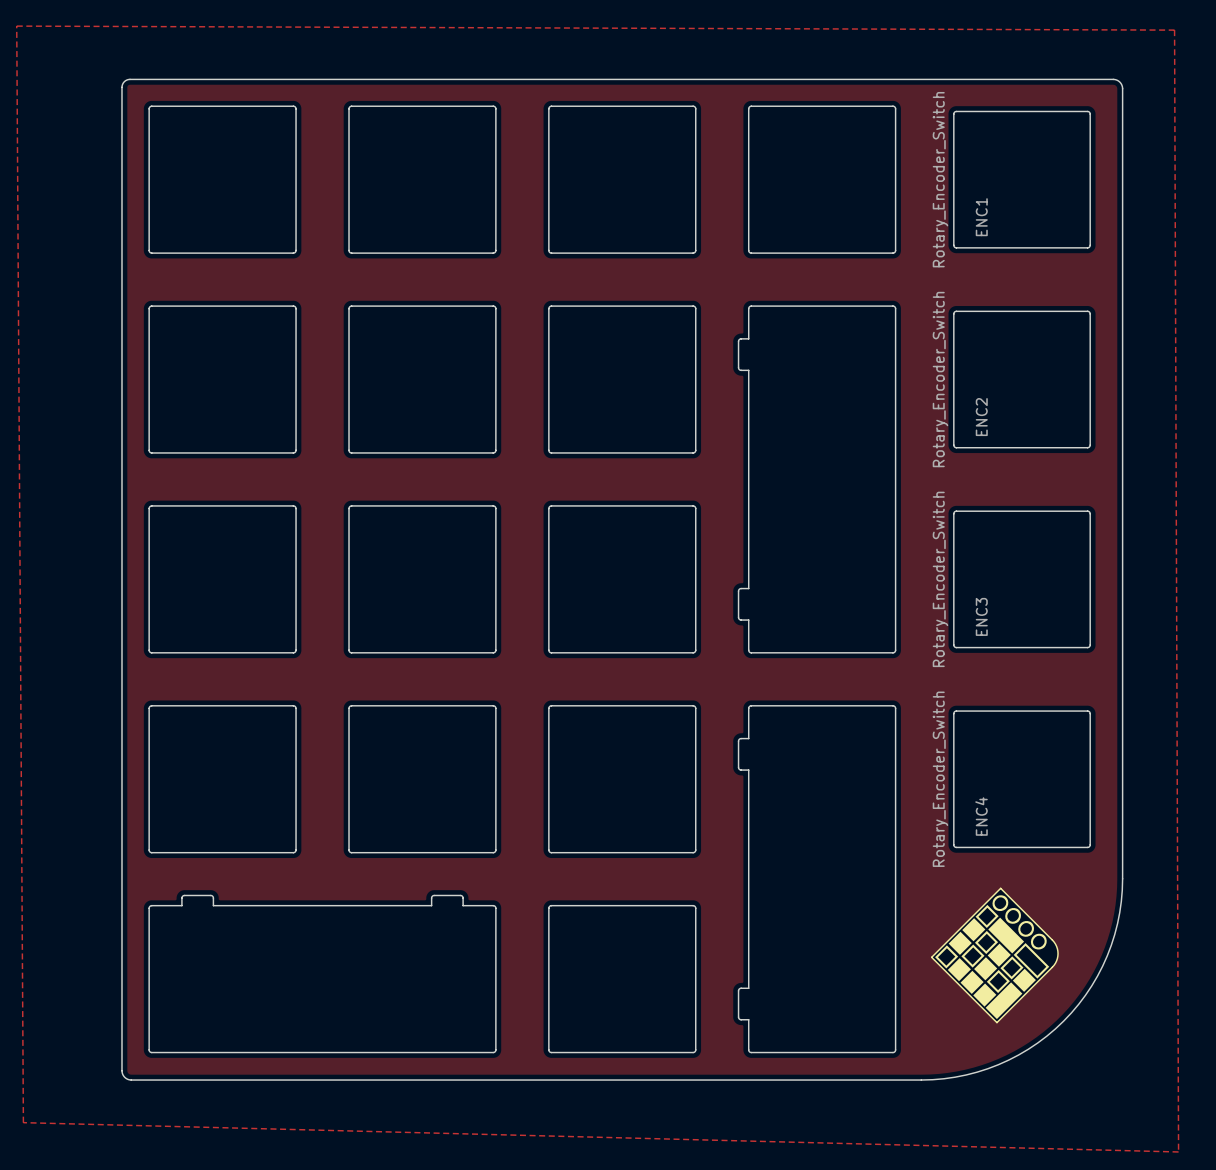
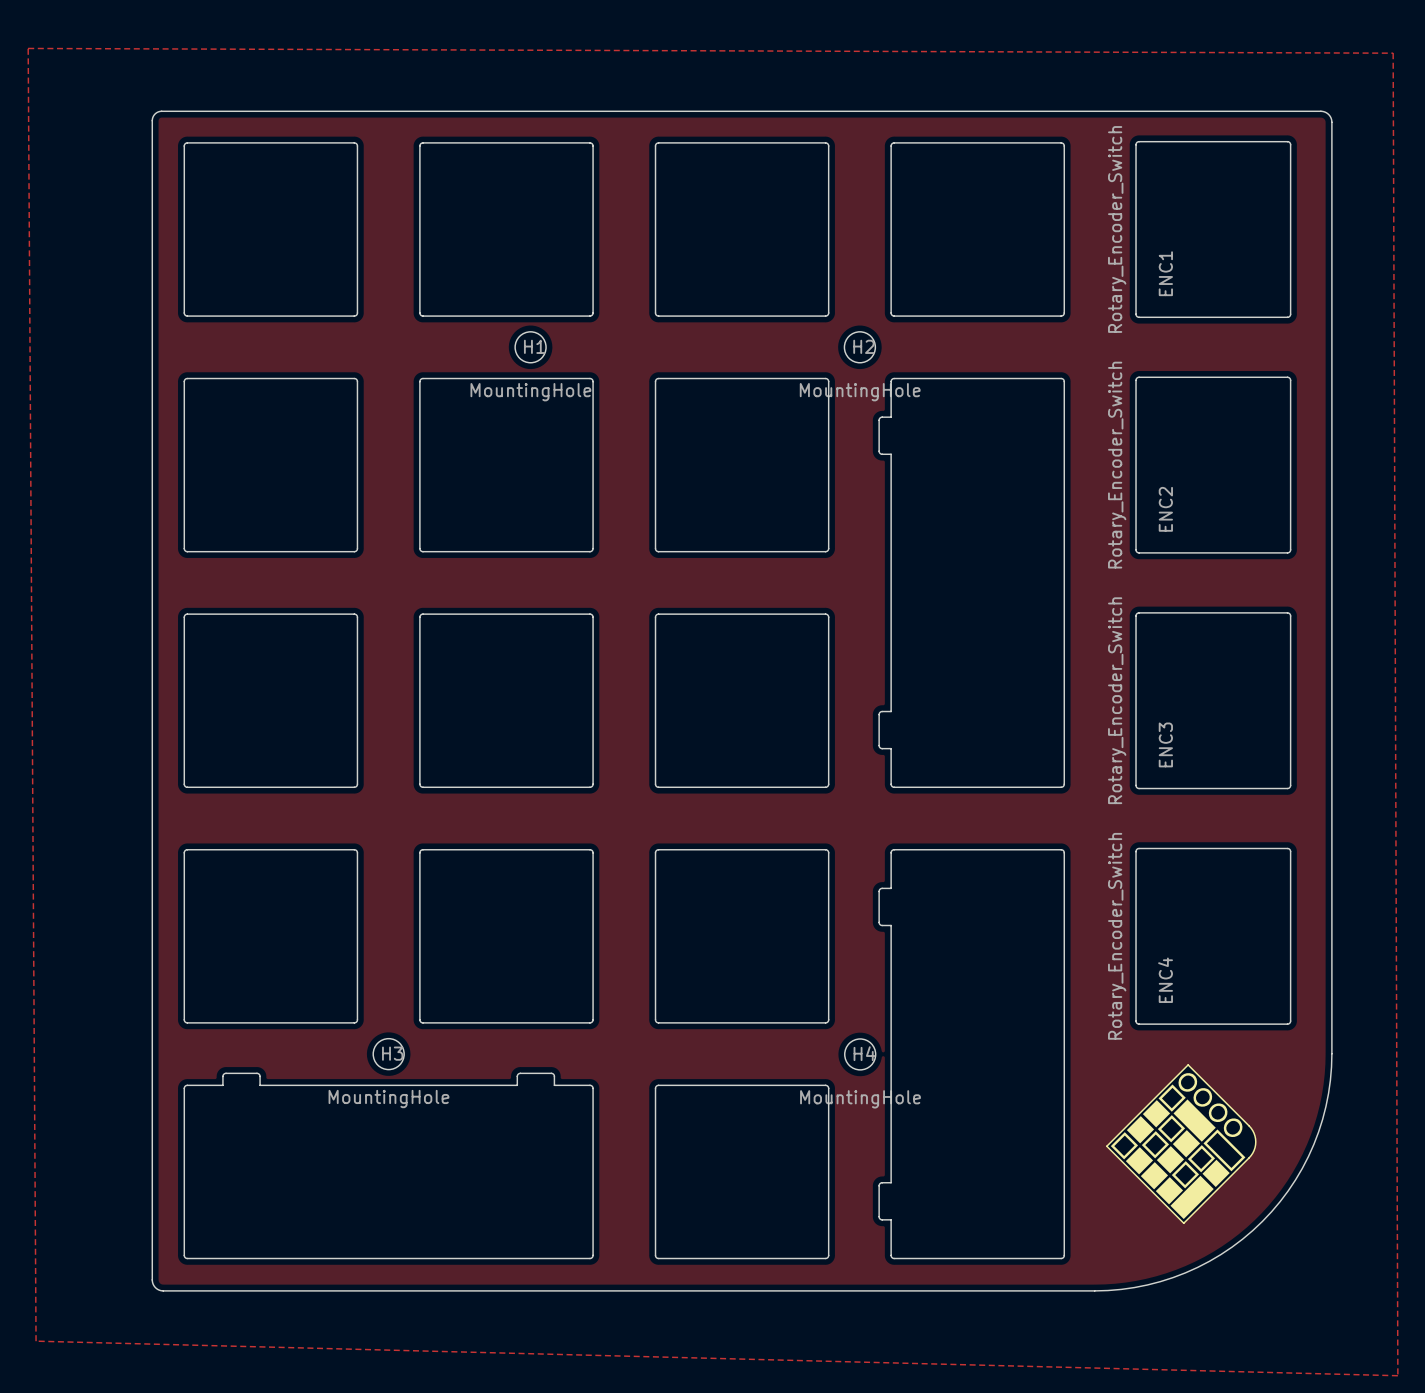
ENC1 footprint: [953, 110, 1091, 249] -> [1135, 141, 1292, 318]
H1: none -> MountingHole (530, 347)
H2: none -> MountingHole (859, 347)
ENC2 footprint: [953, 310, 1091, 449] -> [1135, 376, 1292, 554]
ENC3 footprint: [953, 510, 1091, 649] -> [1135, 612, 1292, 790]
ENC4 footprint: [953, 710, 1091, 848] -> [1135, 847, 1292, 1025]
H3: none -> MountingHole (388, 1054)
H4: none -> MountingHole (860, 1054)

